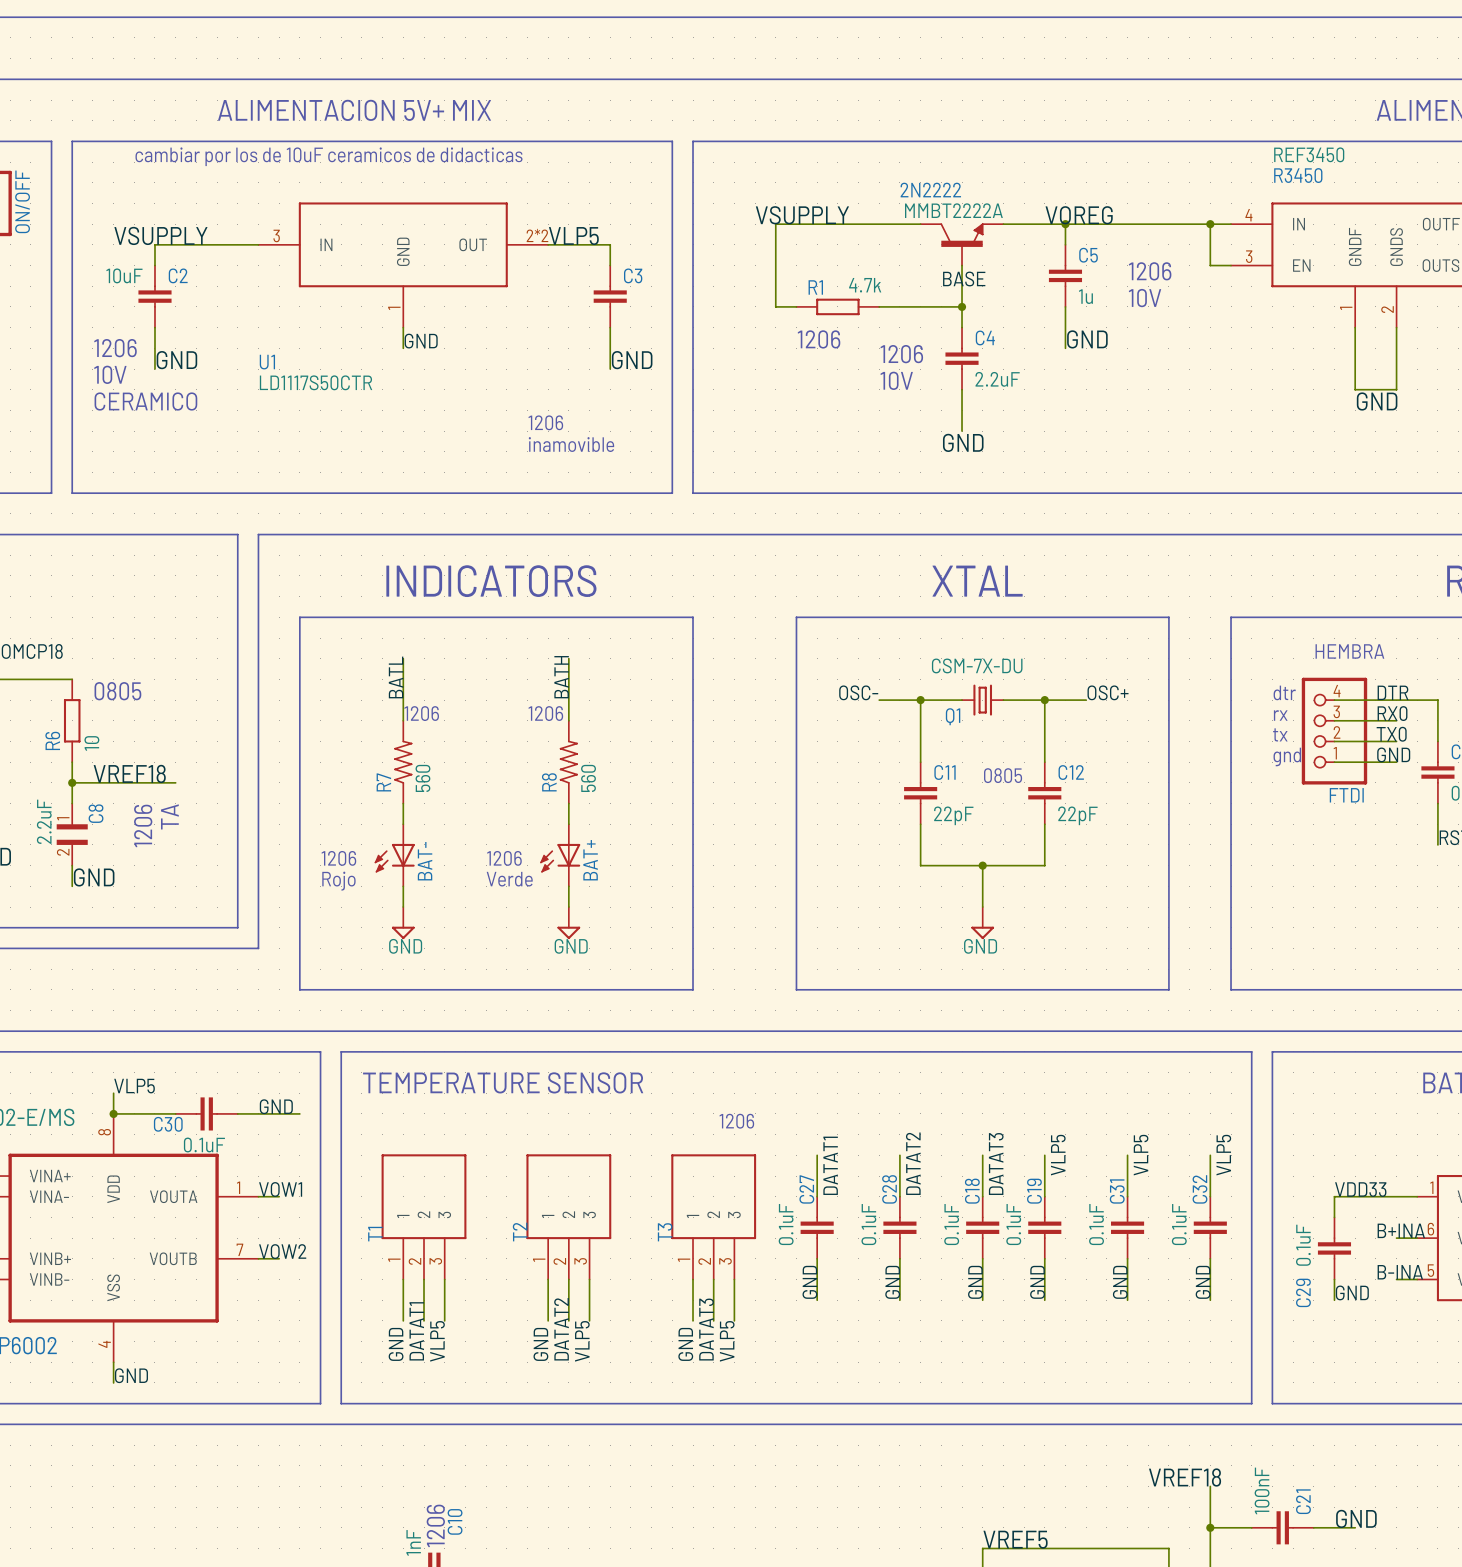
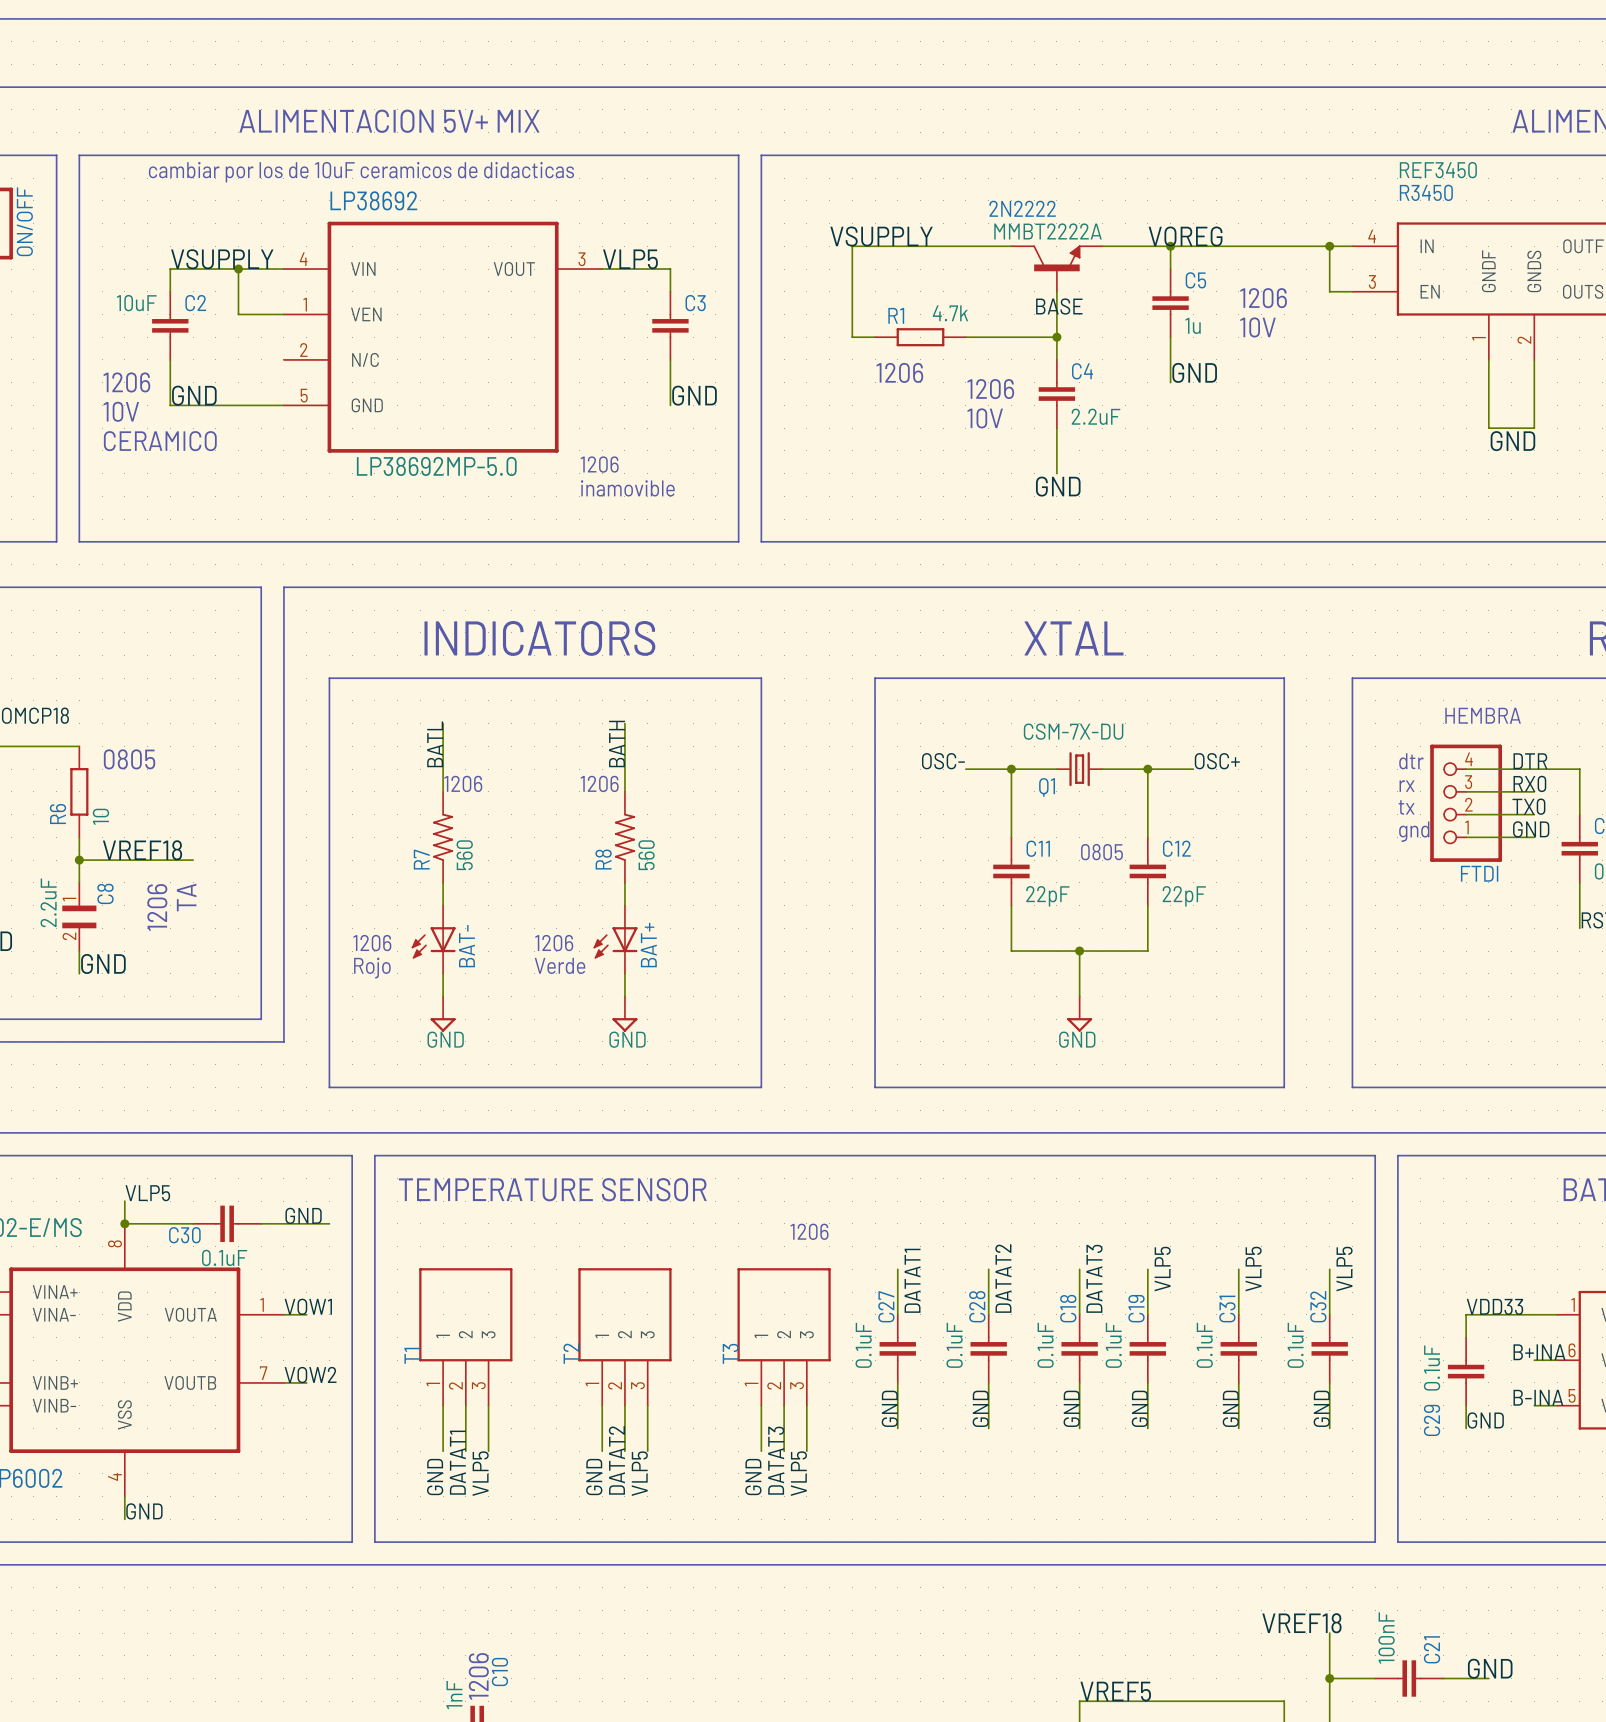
label position: VSUPPLY (160, 235) -> VSUPPLY (222, 259)
wire: none -> (238, 269) (238, 314) (283, 314)
junction: none -> (238, 269)
U1: LD1117S50CTR (403, 265) -> none
LP38692: none -> LP38692MP-5.0 (443, 337)
wire: (403, 327) (403, 348) -> none
label: GND (421, 341) -> none
wire: none -> (170, 405) (283, 405)

